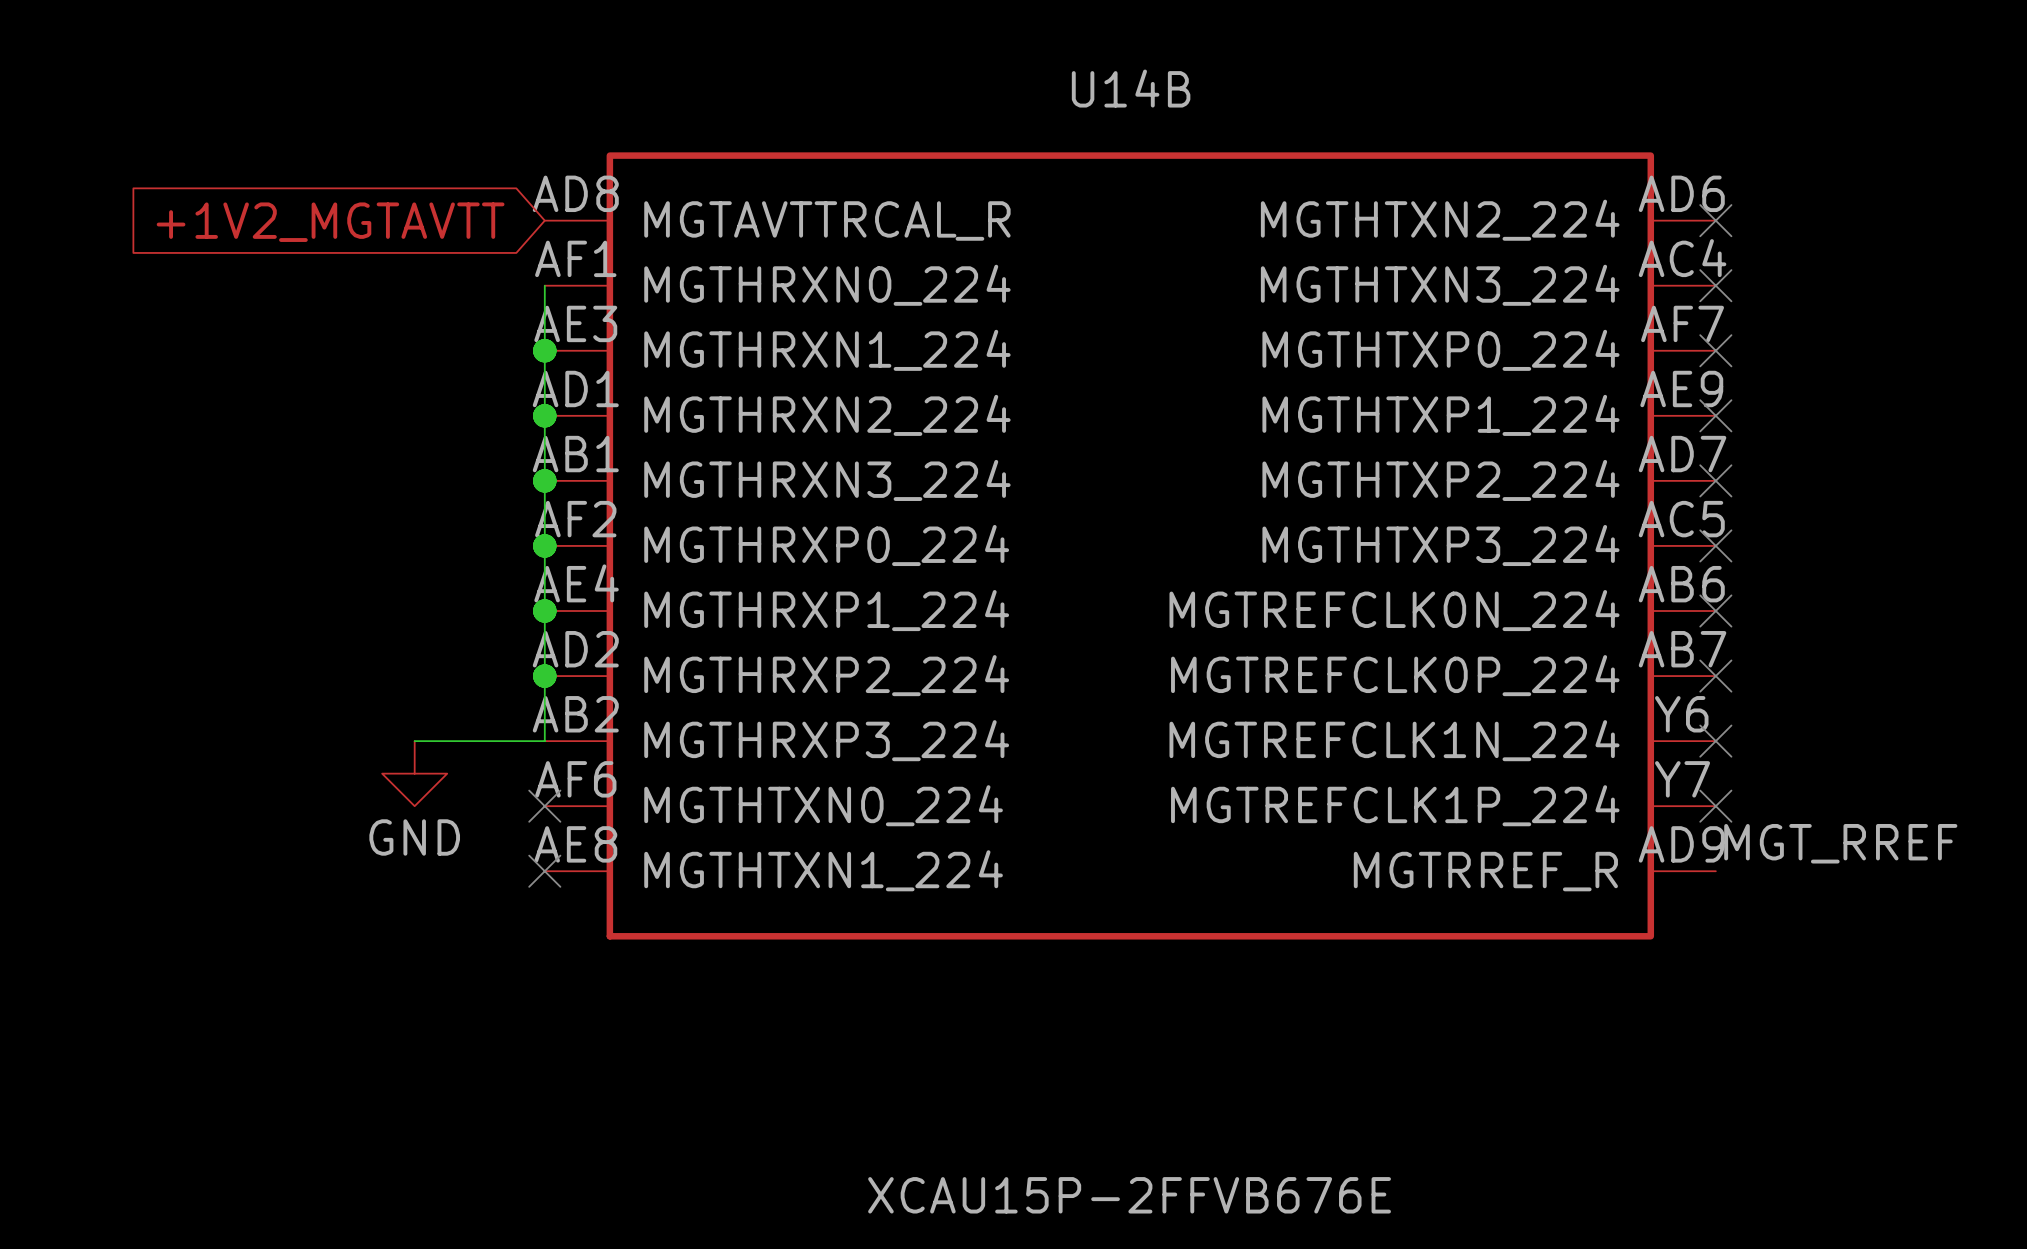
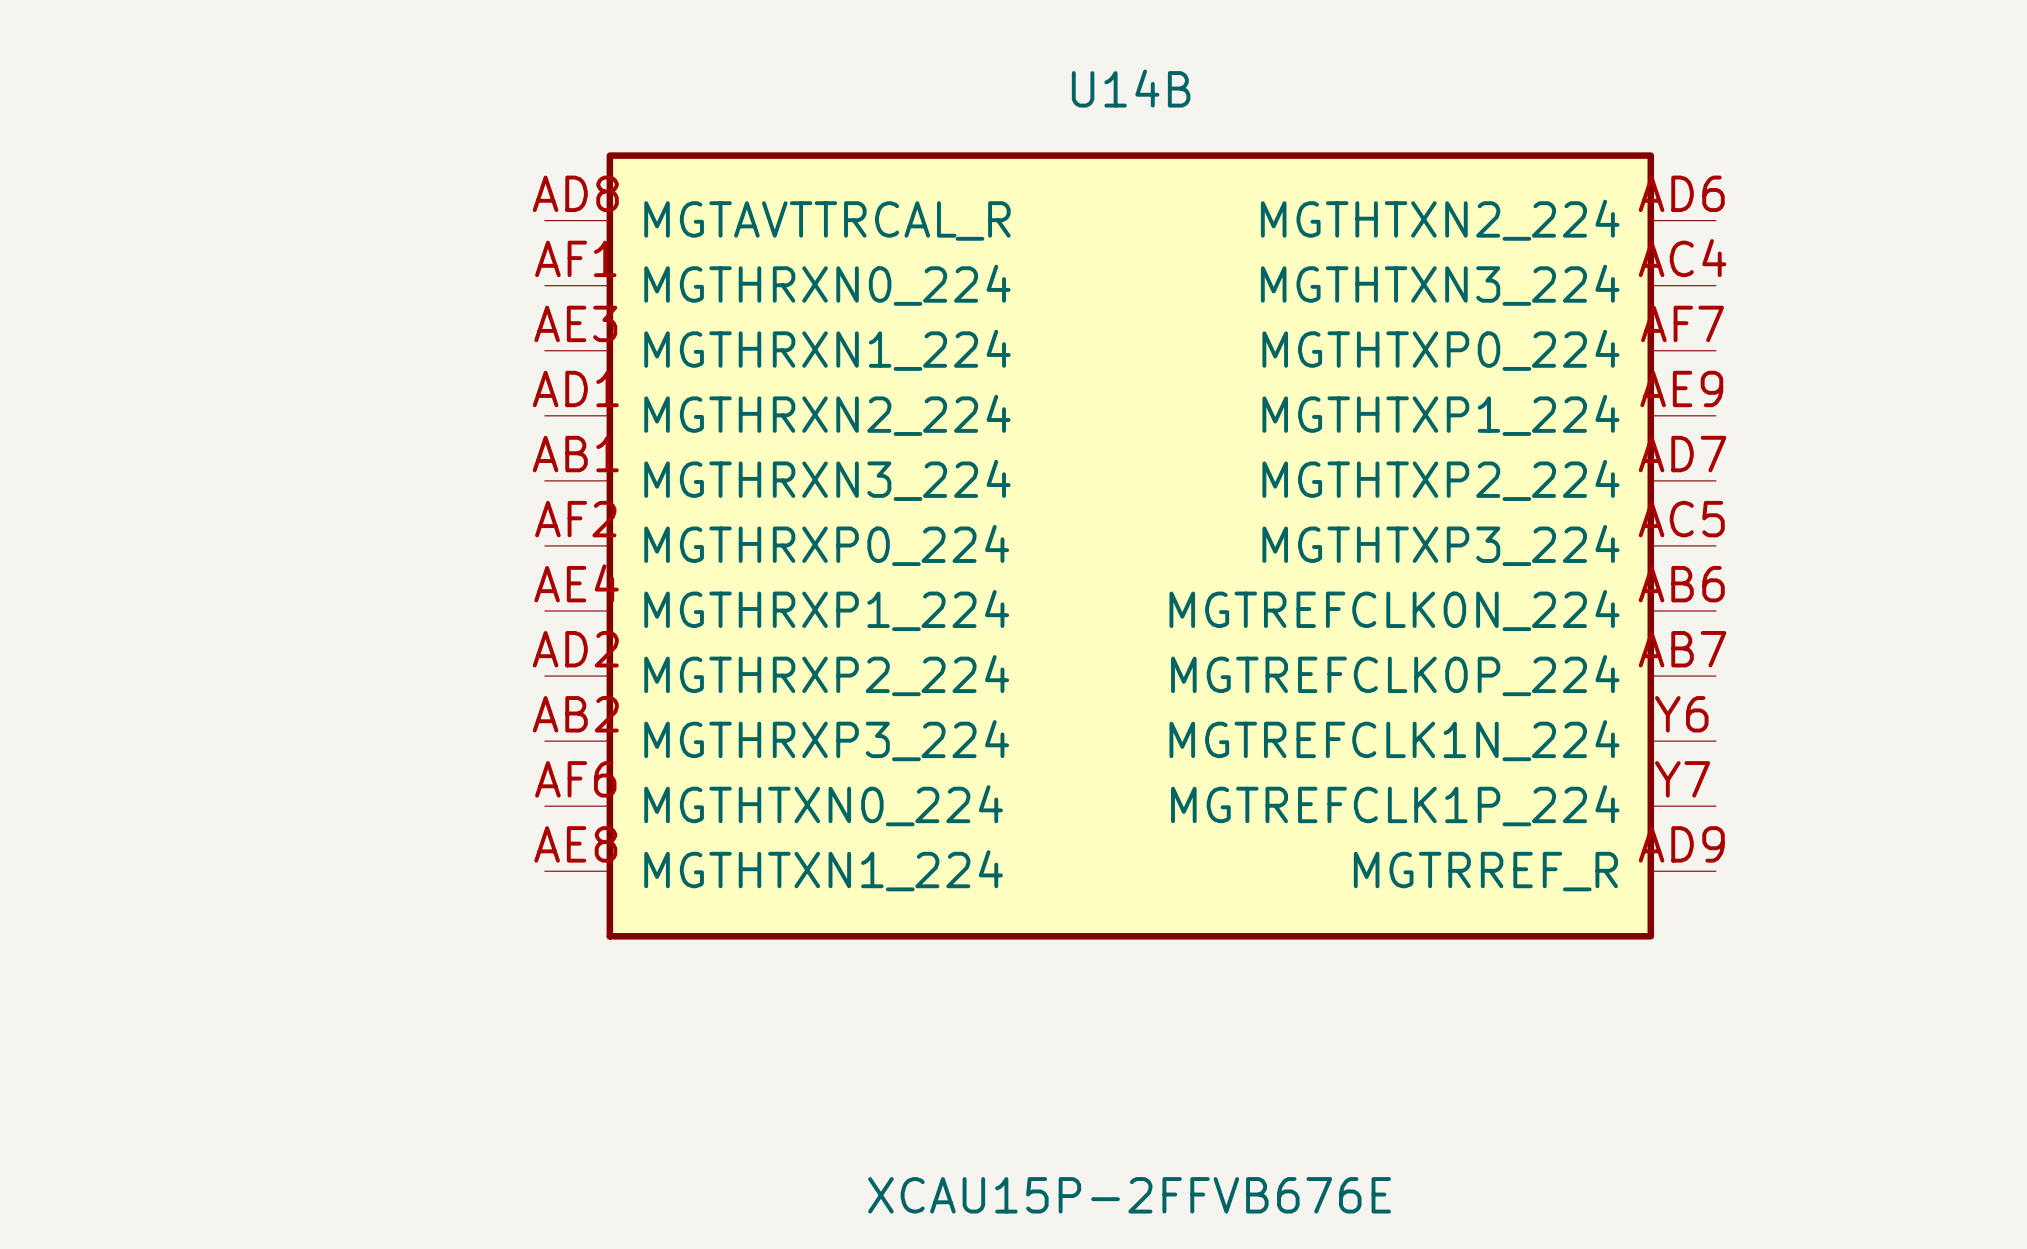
no-connect mark: (1715, 220) -> none
global label: +1V2_MGTAVTT (330, 222) -> none
wire: (544, 285) (544, 741) (414, 741) -> none
no-connect mark: (1715, 285) -> none
junction: (544, 350) -> none
no-connect mark: (1715, 350) -> none
junction: (544, 415) -> none
no-connect mark: (1715, 415) -> none
junction: (544, 480) -> none
no-connect mark: (1715, 480) -> none
junction: (544, 545) -> none
no-connect mark: (1715, 545) -> none
junction: (544, 611) -> none
no-connect mark: (1715, 611) -> none
junction: (544, 676) -> none
no-connect mark: (1715, 676) -> none
no-connect mark: (1715, 741) -> none
power symbol: GND (414, 773) -> none
no-connect mark: (544, 806) -> none
no-connect mark: (1715, 806) -> none
label: MGT_RREF (1840, 843) -> none
no-connect mark: (544, 871) -> none

